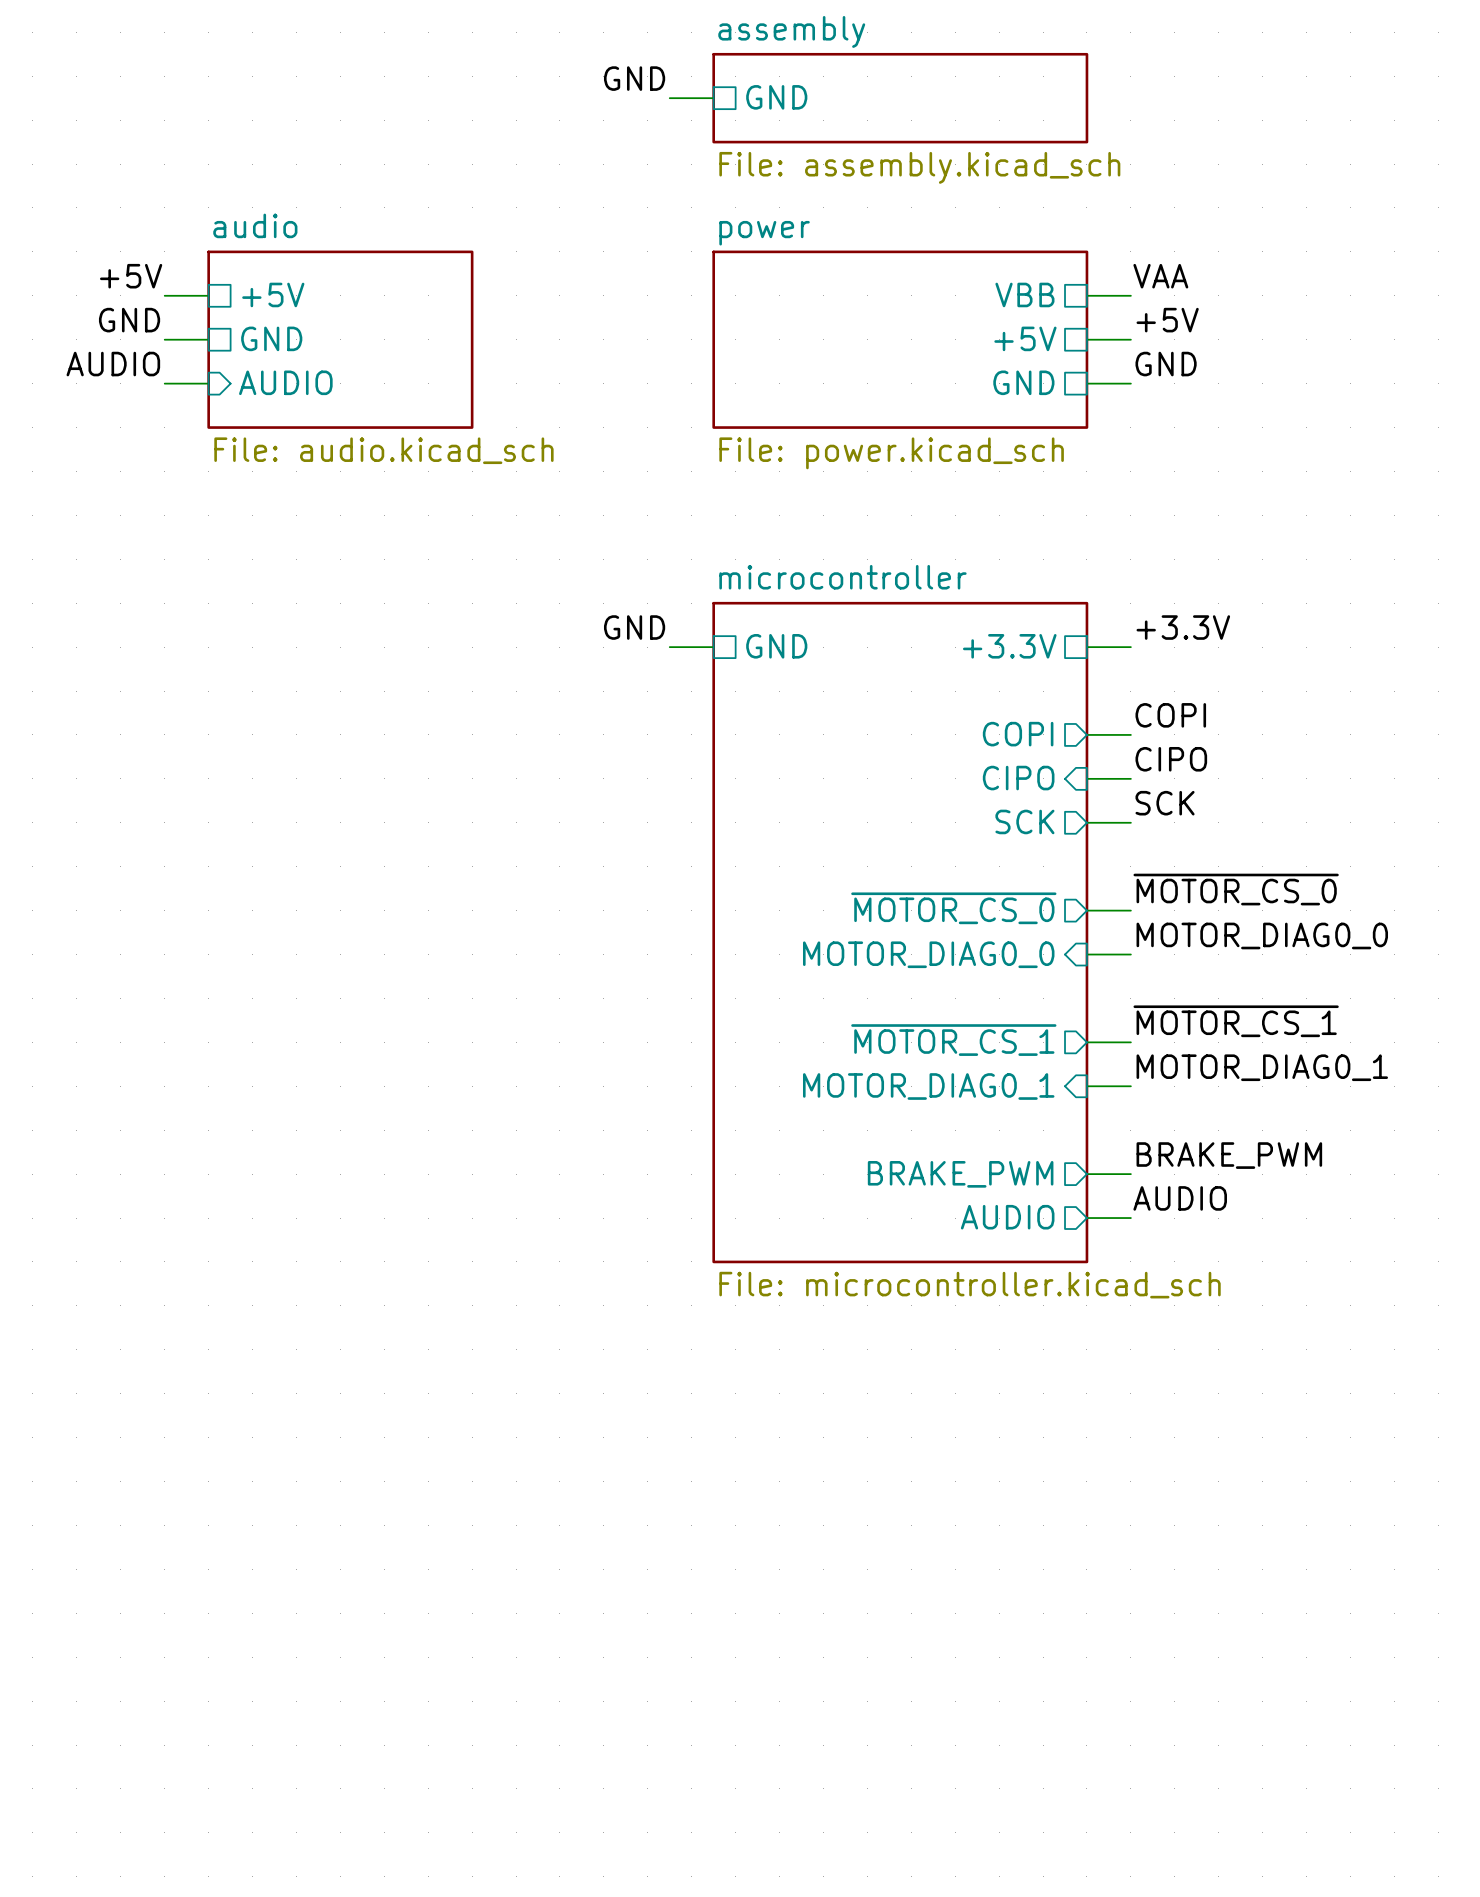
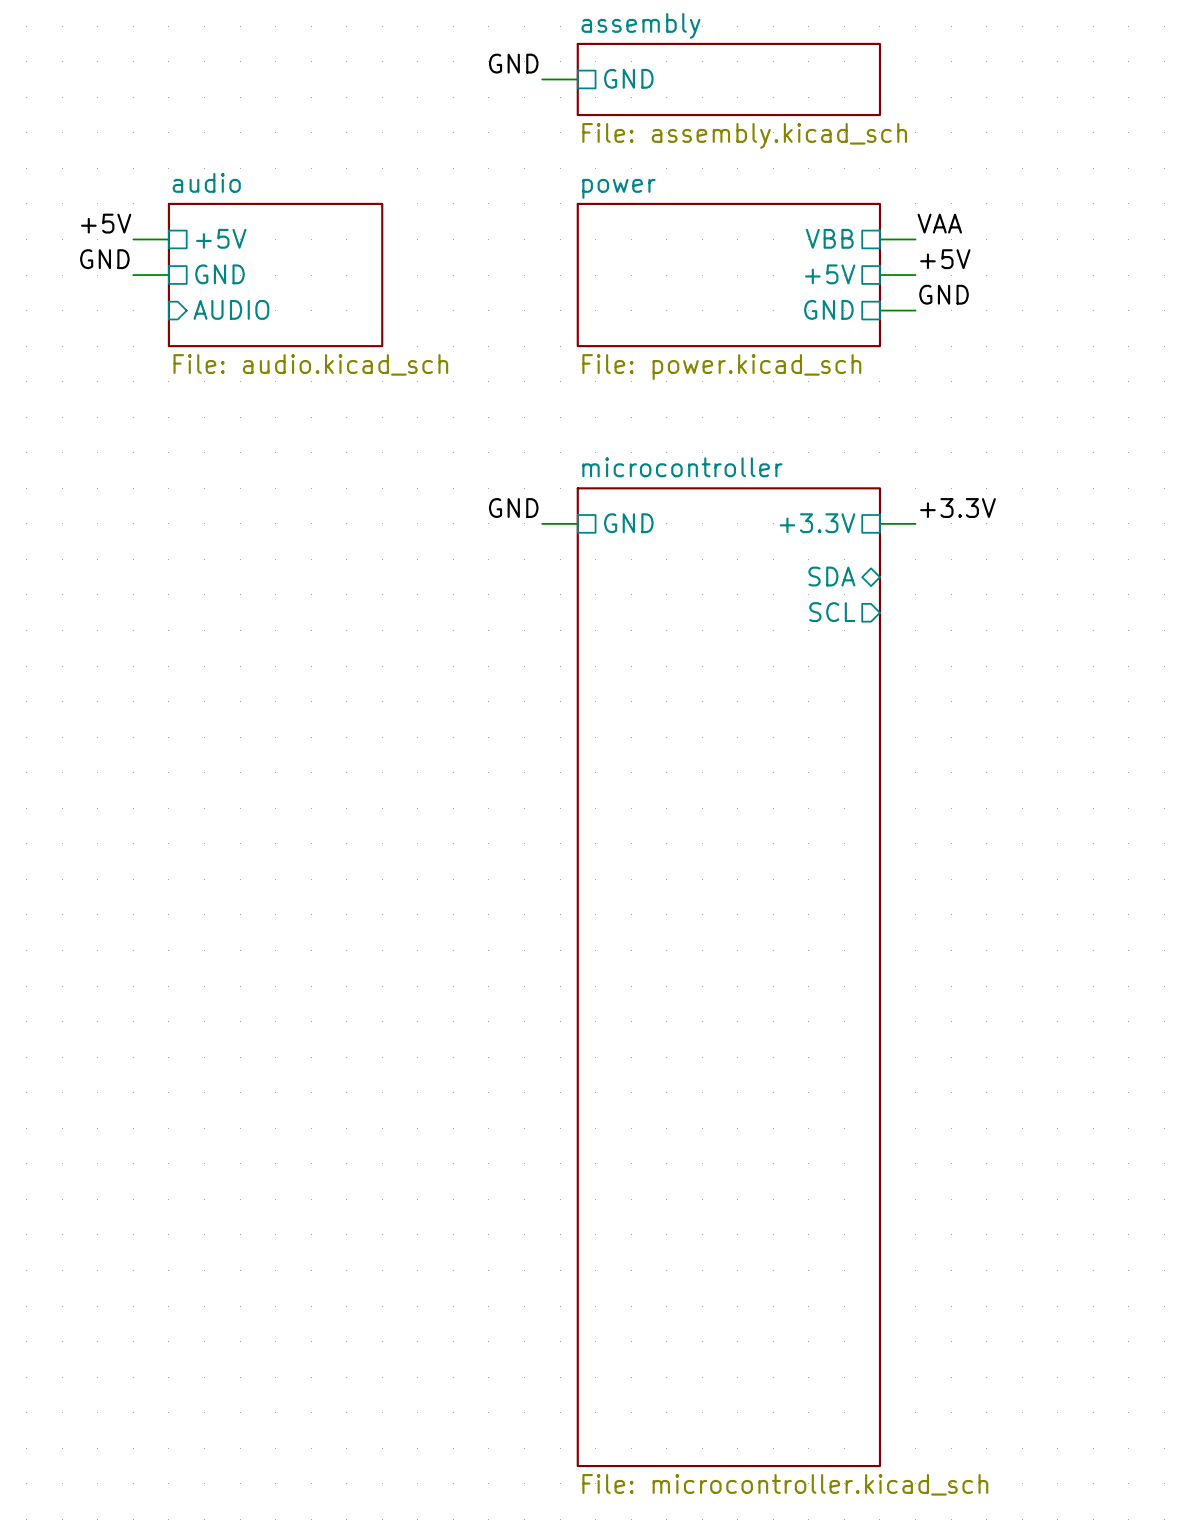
label: AUDIO (113, 364) -> none
wire: (164, 383) (208, 383) -> none
sheet pin: none -> SDA (831, 576)
label: COPI (1170, 715) -> none
sheet pin: COPI (1018, 734) -> none
wire: (1086, 734) (1130, 734) -> none
sheet pin: none -> SCL (832, 612)
label: CIPO (1171, 759) -> none
sheet pin: CIPO (1018, 778) -> none
wire: (1086, 778) (1130, 778) -> none
label: SCK (1165, 803) -> none
sheet pin: SCK (1024, 821) -> none
wire: (1086, 822) (1130, 822) -> none
label: ~{MOTOR_CS_0} (1236, 889) -> none
sheet pin: ~{MOTOR_CS_0} (953, 908) -> none
wire: (1086, 910) (1130, 910) -> none
sheet microcontroller: File: microcontroller.kicad_sch (900, 932) -> none
label: MOTOR_DIAG0_0 (1262, 935) -> none
sheet pin: MOTOR_DIAG0_0 (928, 954) -> none
wire: (1086, 954) (1130, 954) -> none
label: ~{MOTOR_CS_1} (1236, 1021) -> none
sheet pin: ~{MOTOR_CS_1} (953, 1040) -> none
wire: (1086, 1042) (1130, 1042) -> none
label: MOTOR_DIAG0_1 (1262, 1067) -> none
sheet pin: MOTOR_DIAG0_1 (928, 1086) -> none
wire: (1086, 1086) (1130, 1086) -> none
label: BRAKE_PWM (1229, 1155) -> none
sheet pin: BRAKE_PWM (960, 1174) -> none
wire: (1086, 1174) (1130, 1174) -> none
label: AUDIO (1180, 1198) -> none
sheet microcontroller: none -> File: microcontroller.kicad_sch (728, 977)
sheet pin: AUDIO (1007, 1217) -> none
wire: (1086, 1218) (1130, 1218) -> none

